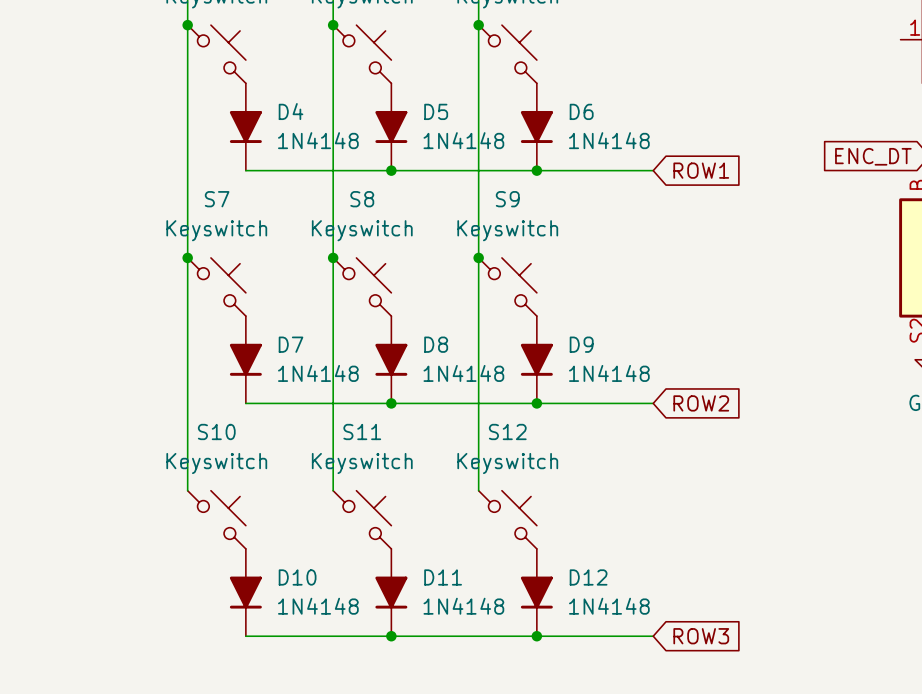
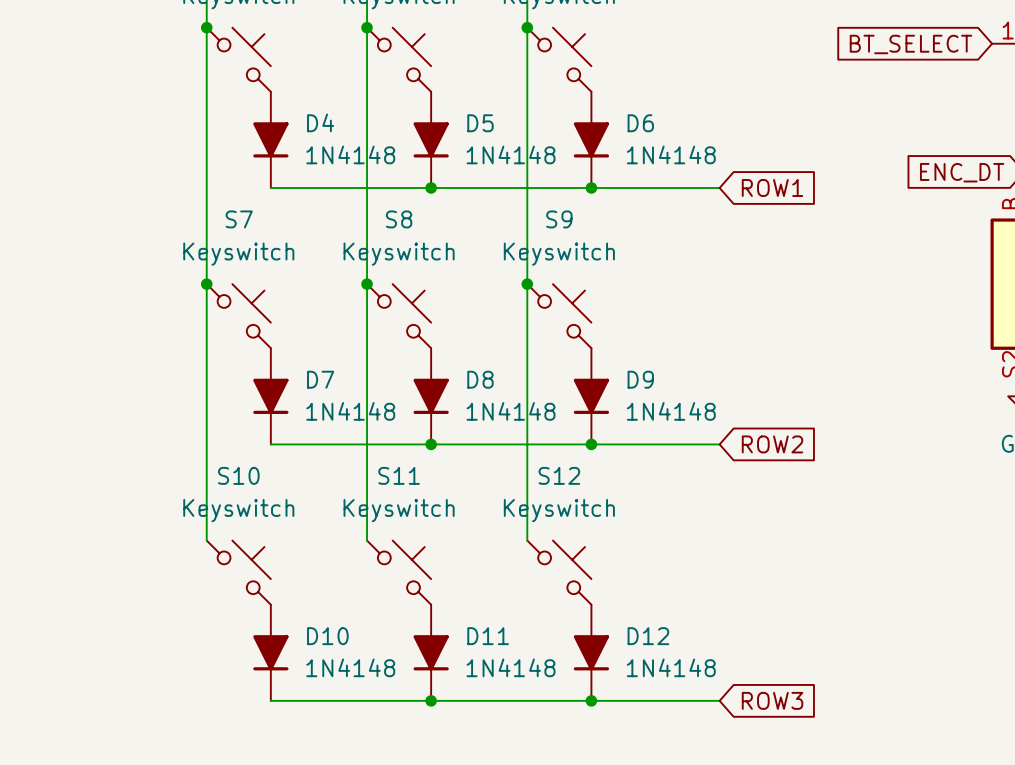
global label: none -> BT_SELECT (910, 44)

